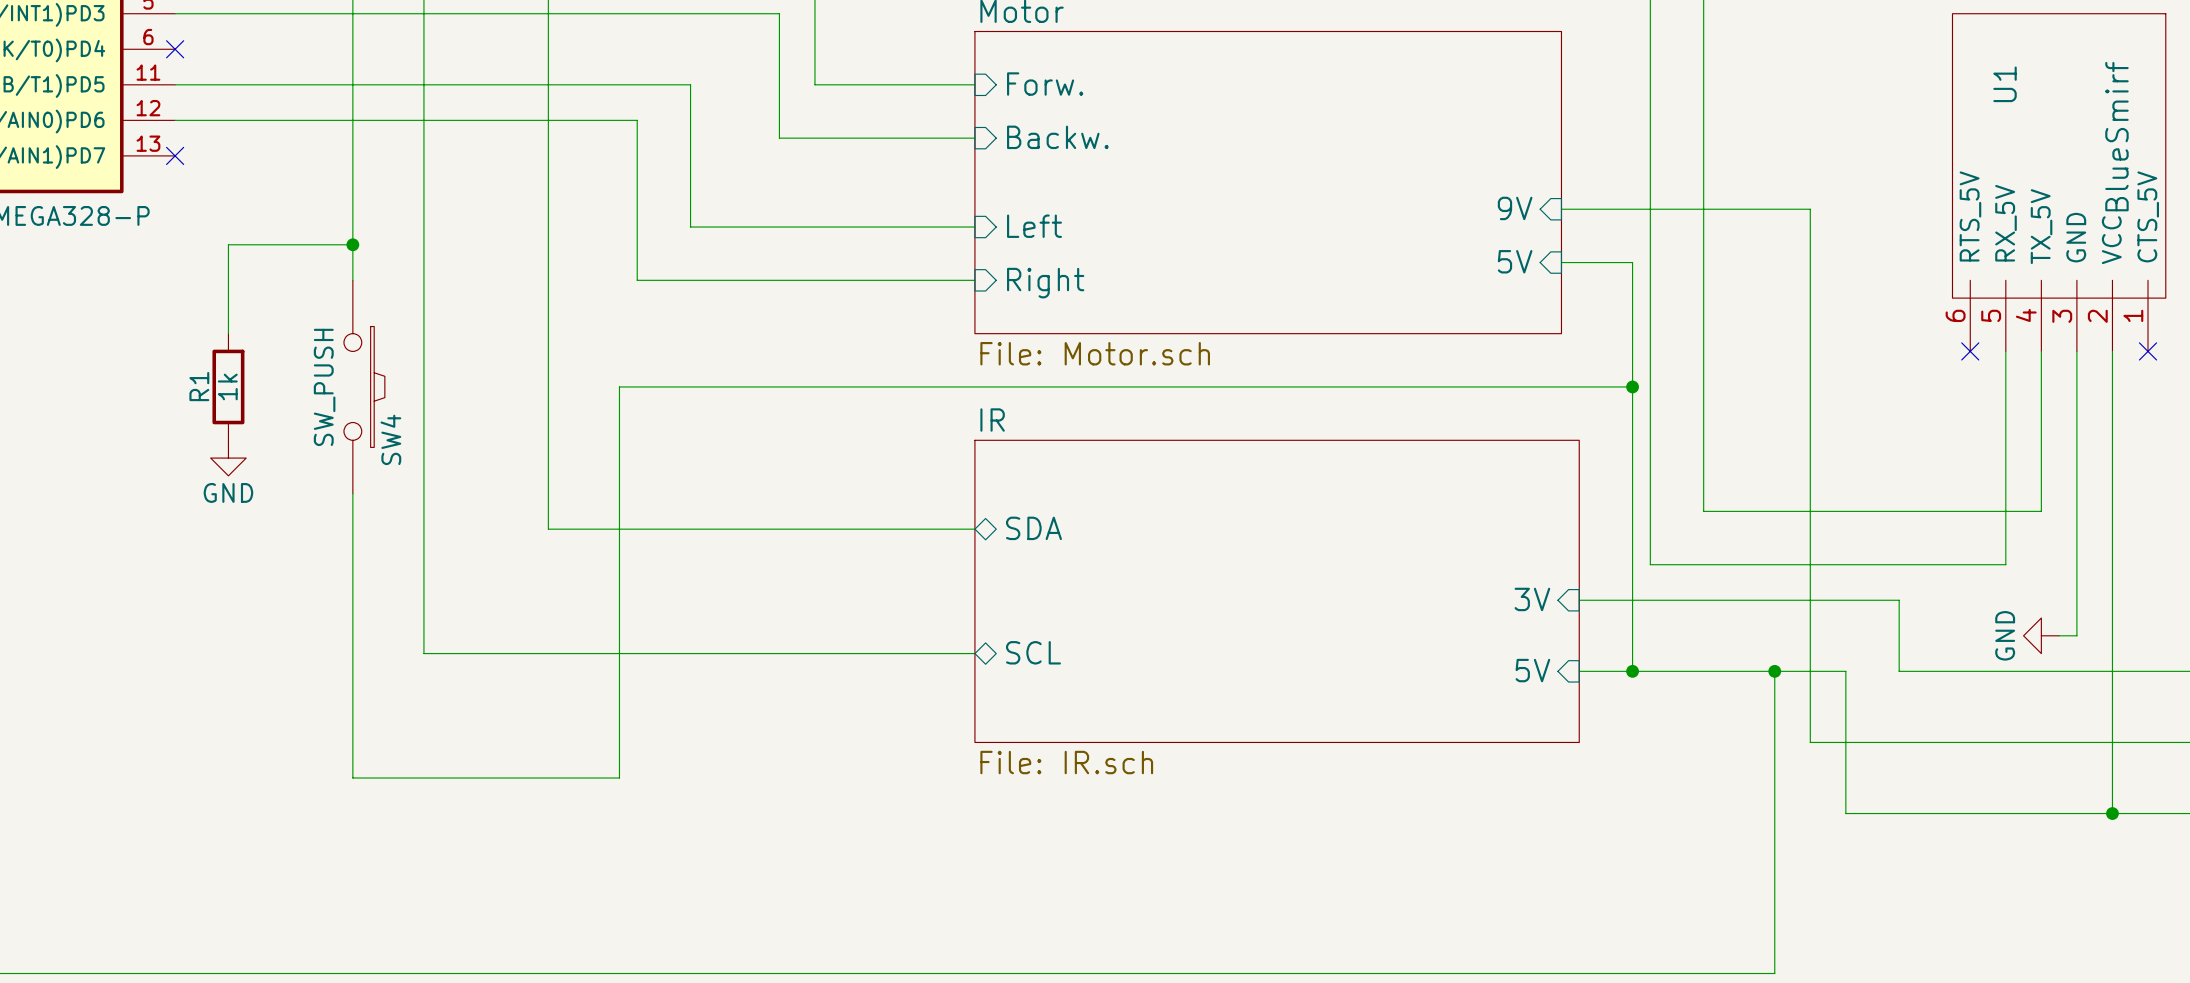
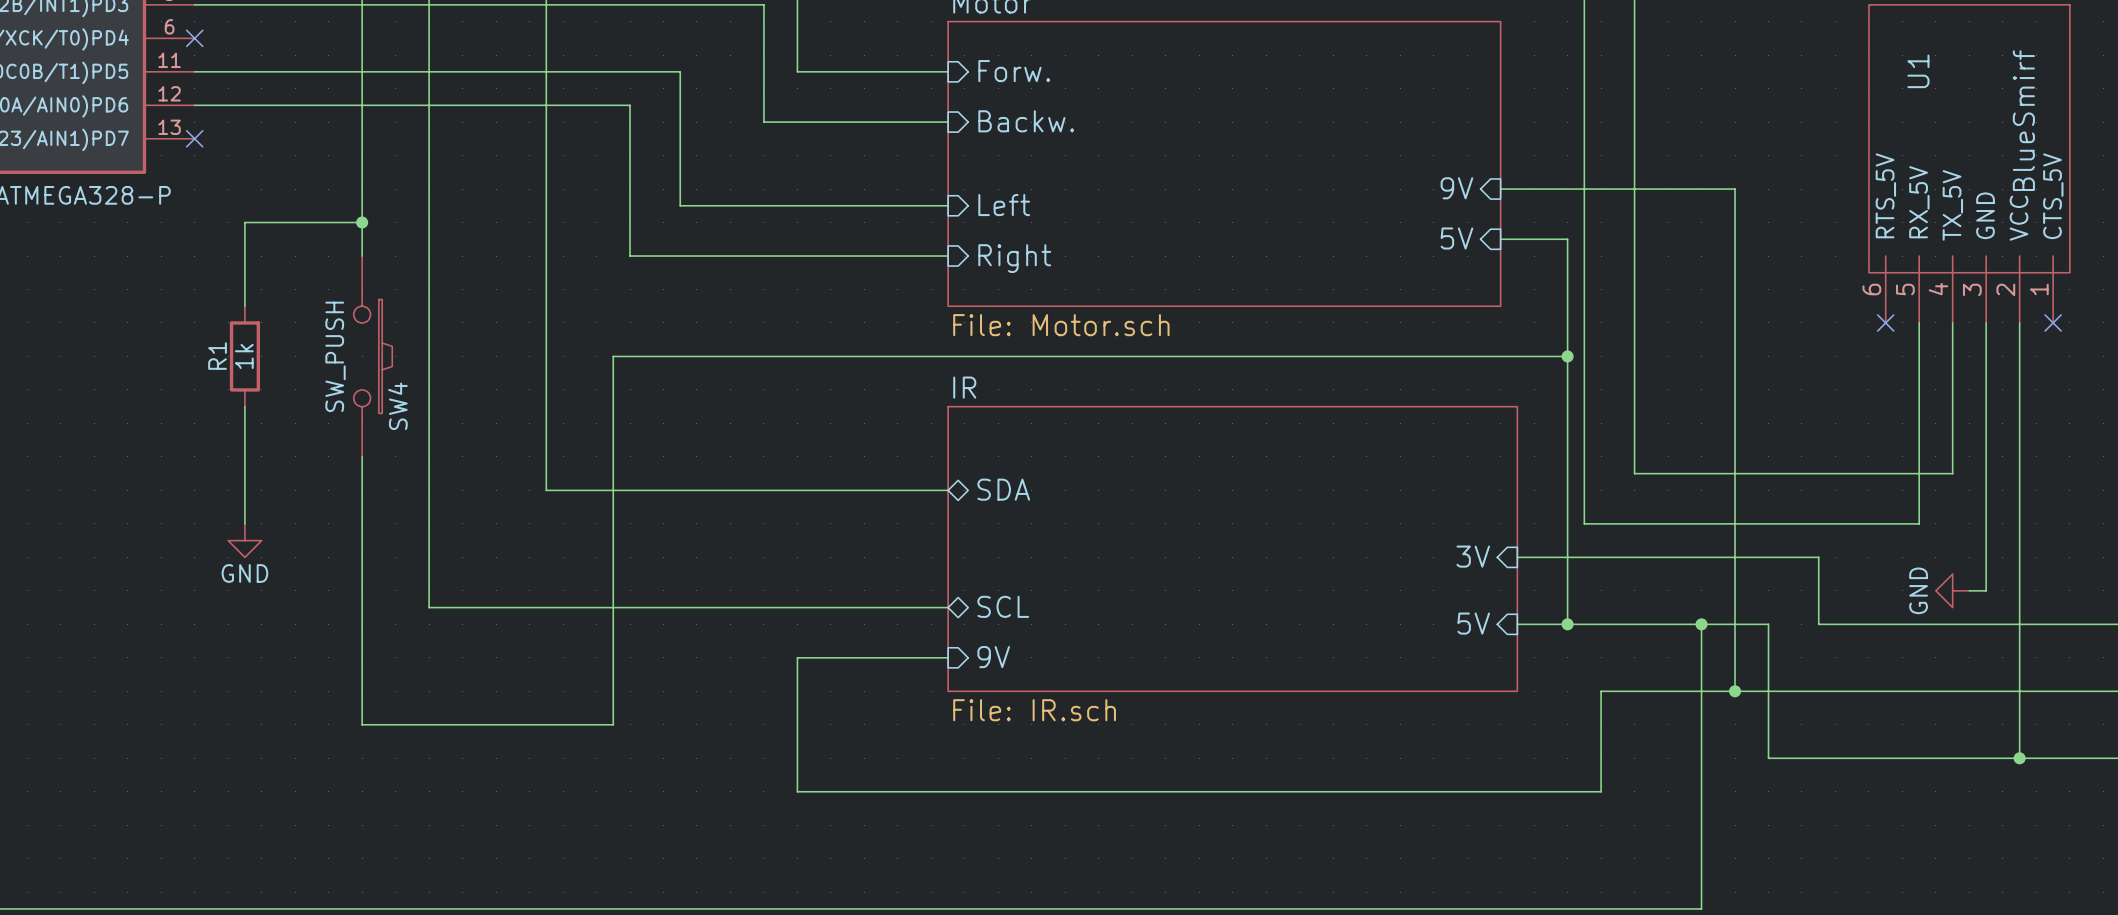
wire: none -> (244, 406) (244, 523)
power symbol position: GND (228, 458) -> GND (244, 540)
wire: none -> (948, 657) (797, 657) (797, 791) (1601, 791) (1601, 691) (1735, 691)
sheet pin: none -> 9V (993, 657)
junction: none -> (1735, 691)

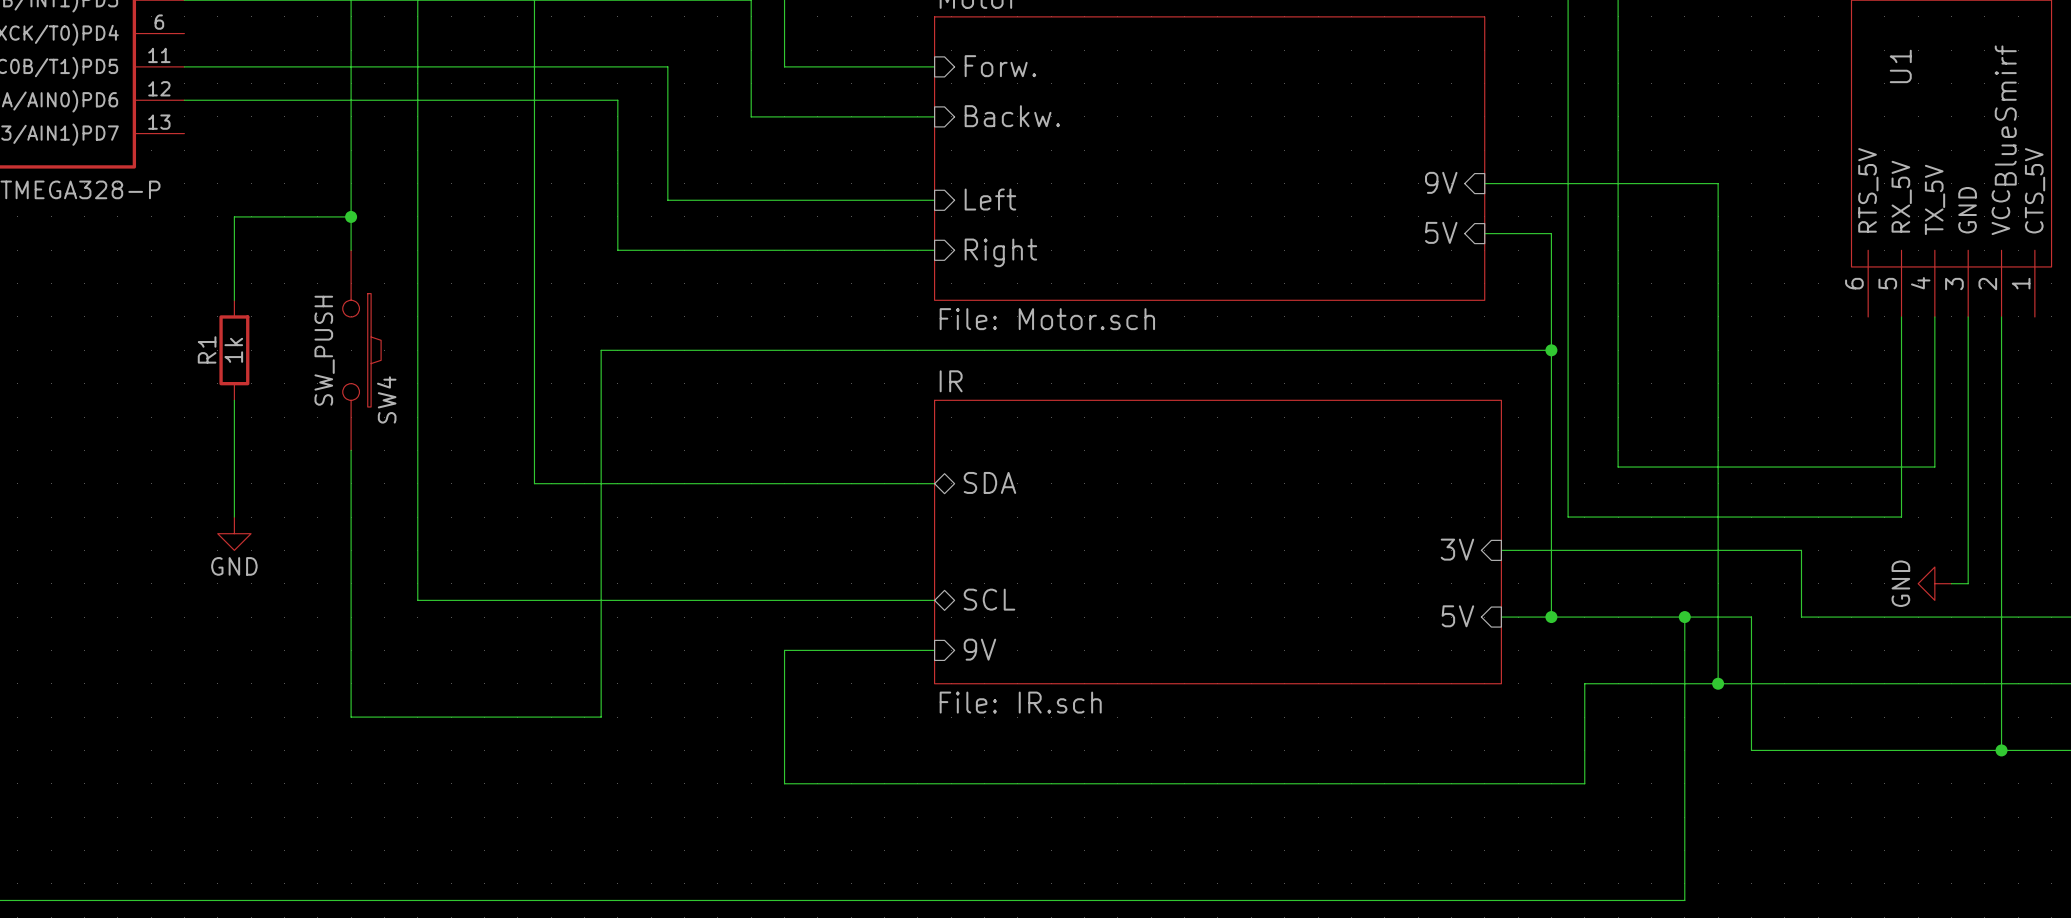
no-connect mark: (194, 38) -> none
no-connect mark: (194, 138) -> none
no-connect mark: (1885, 322) -> none
no-connect mark: (2053, 322) -> none

